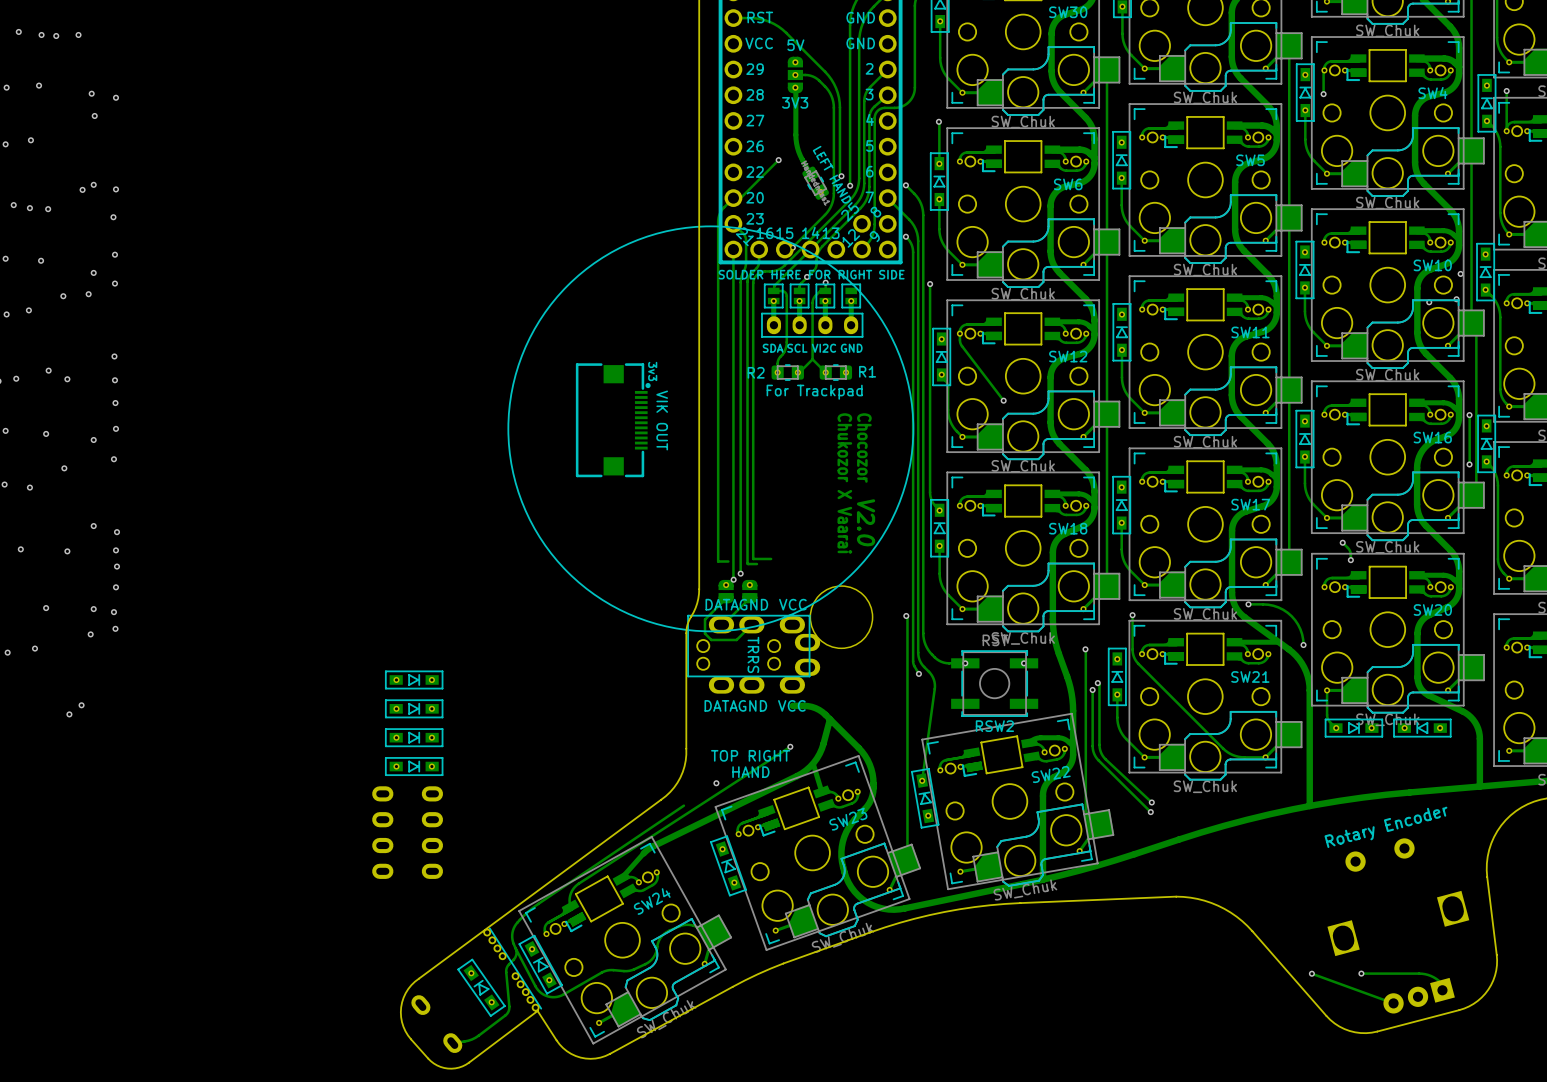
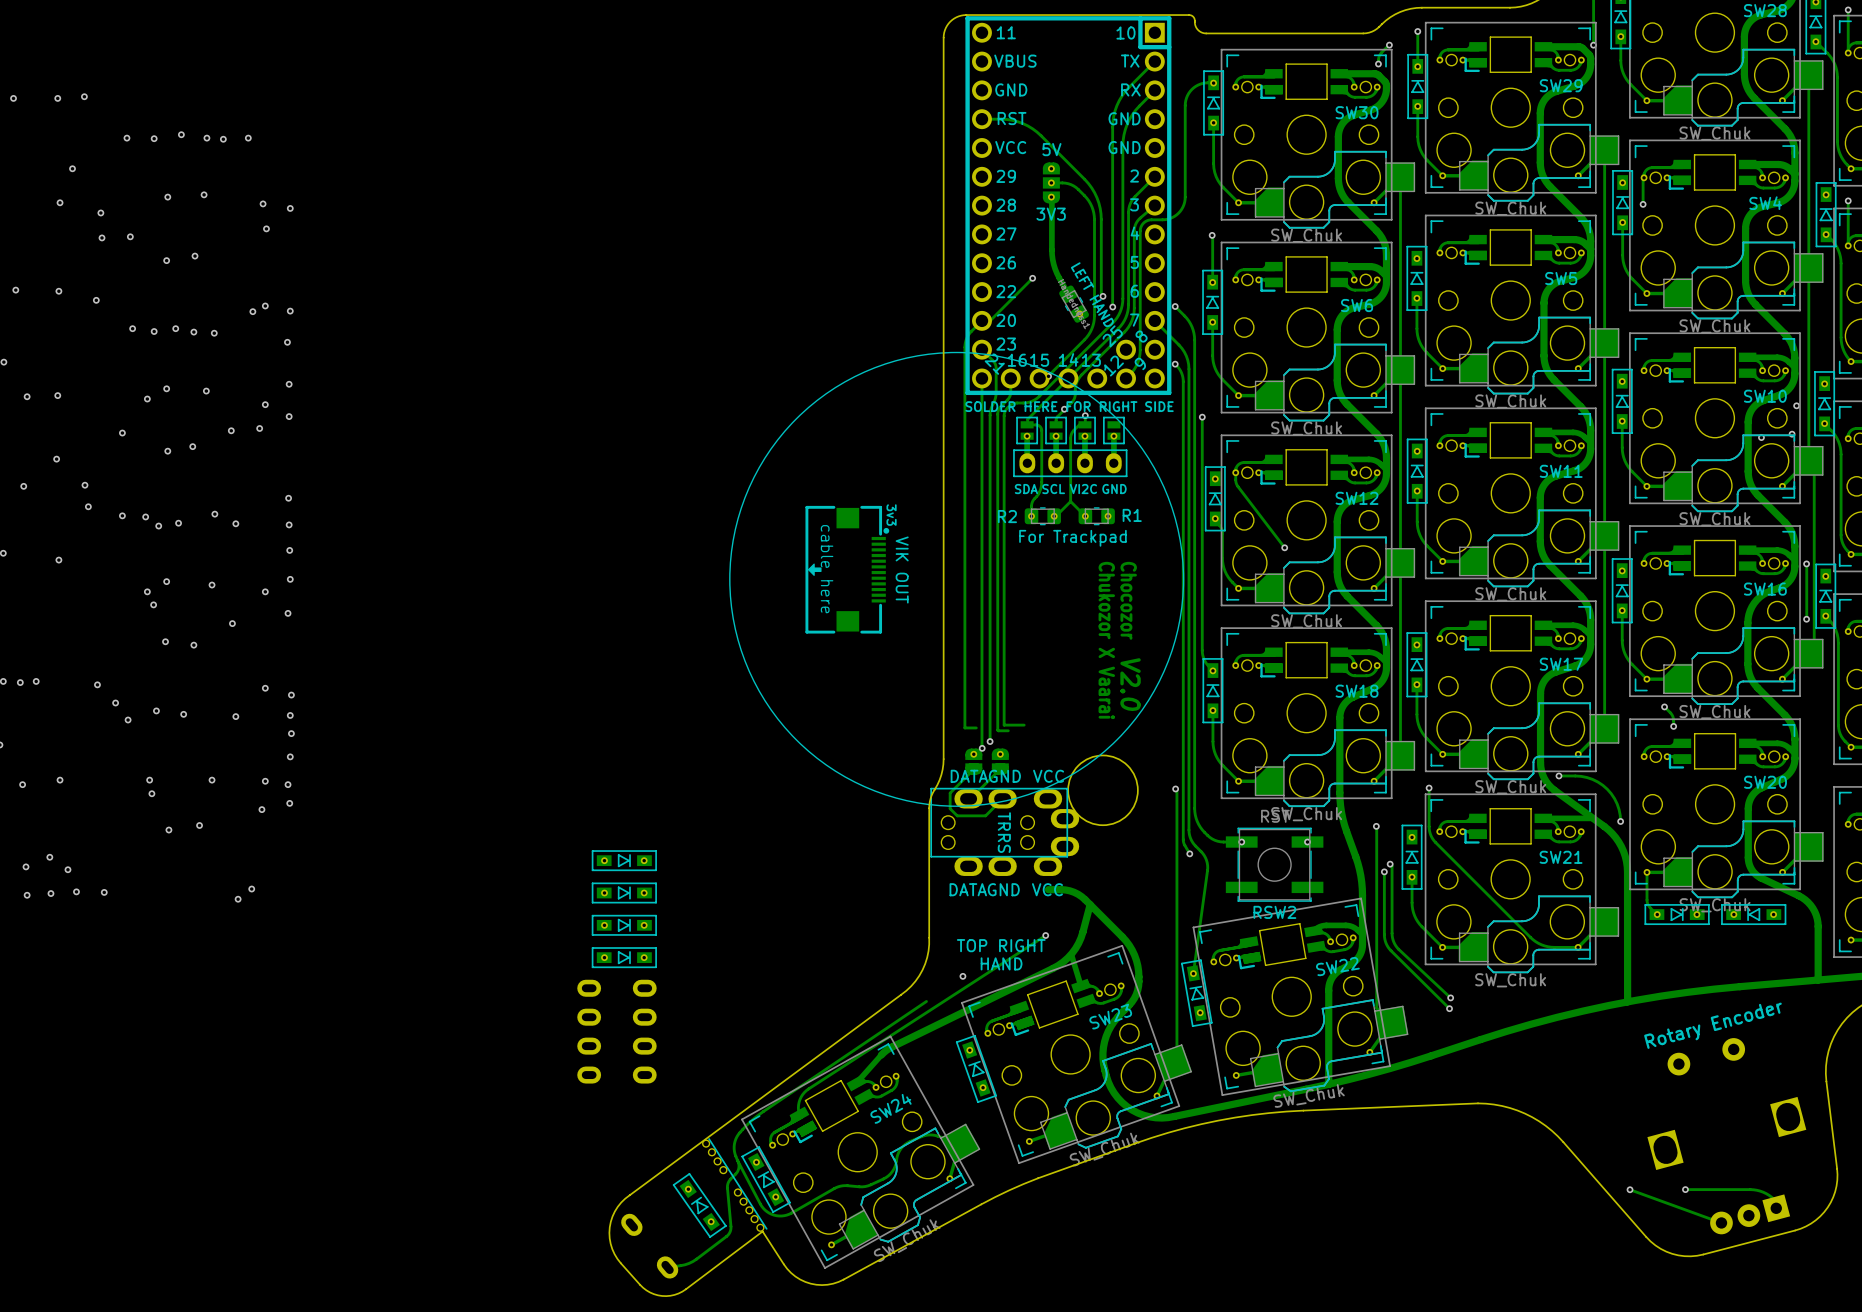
part footprint: [575, 363, 651, 478] -> [805, 505, 890, 634]

